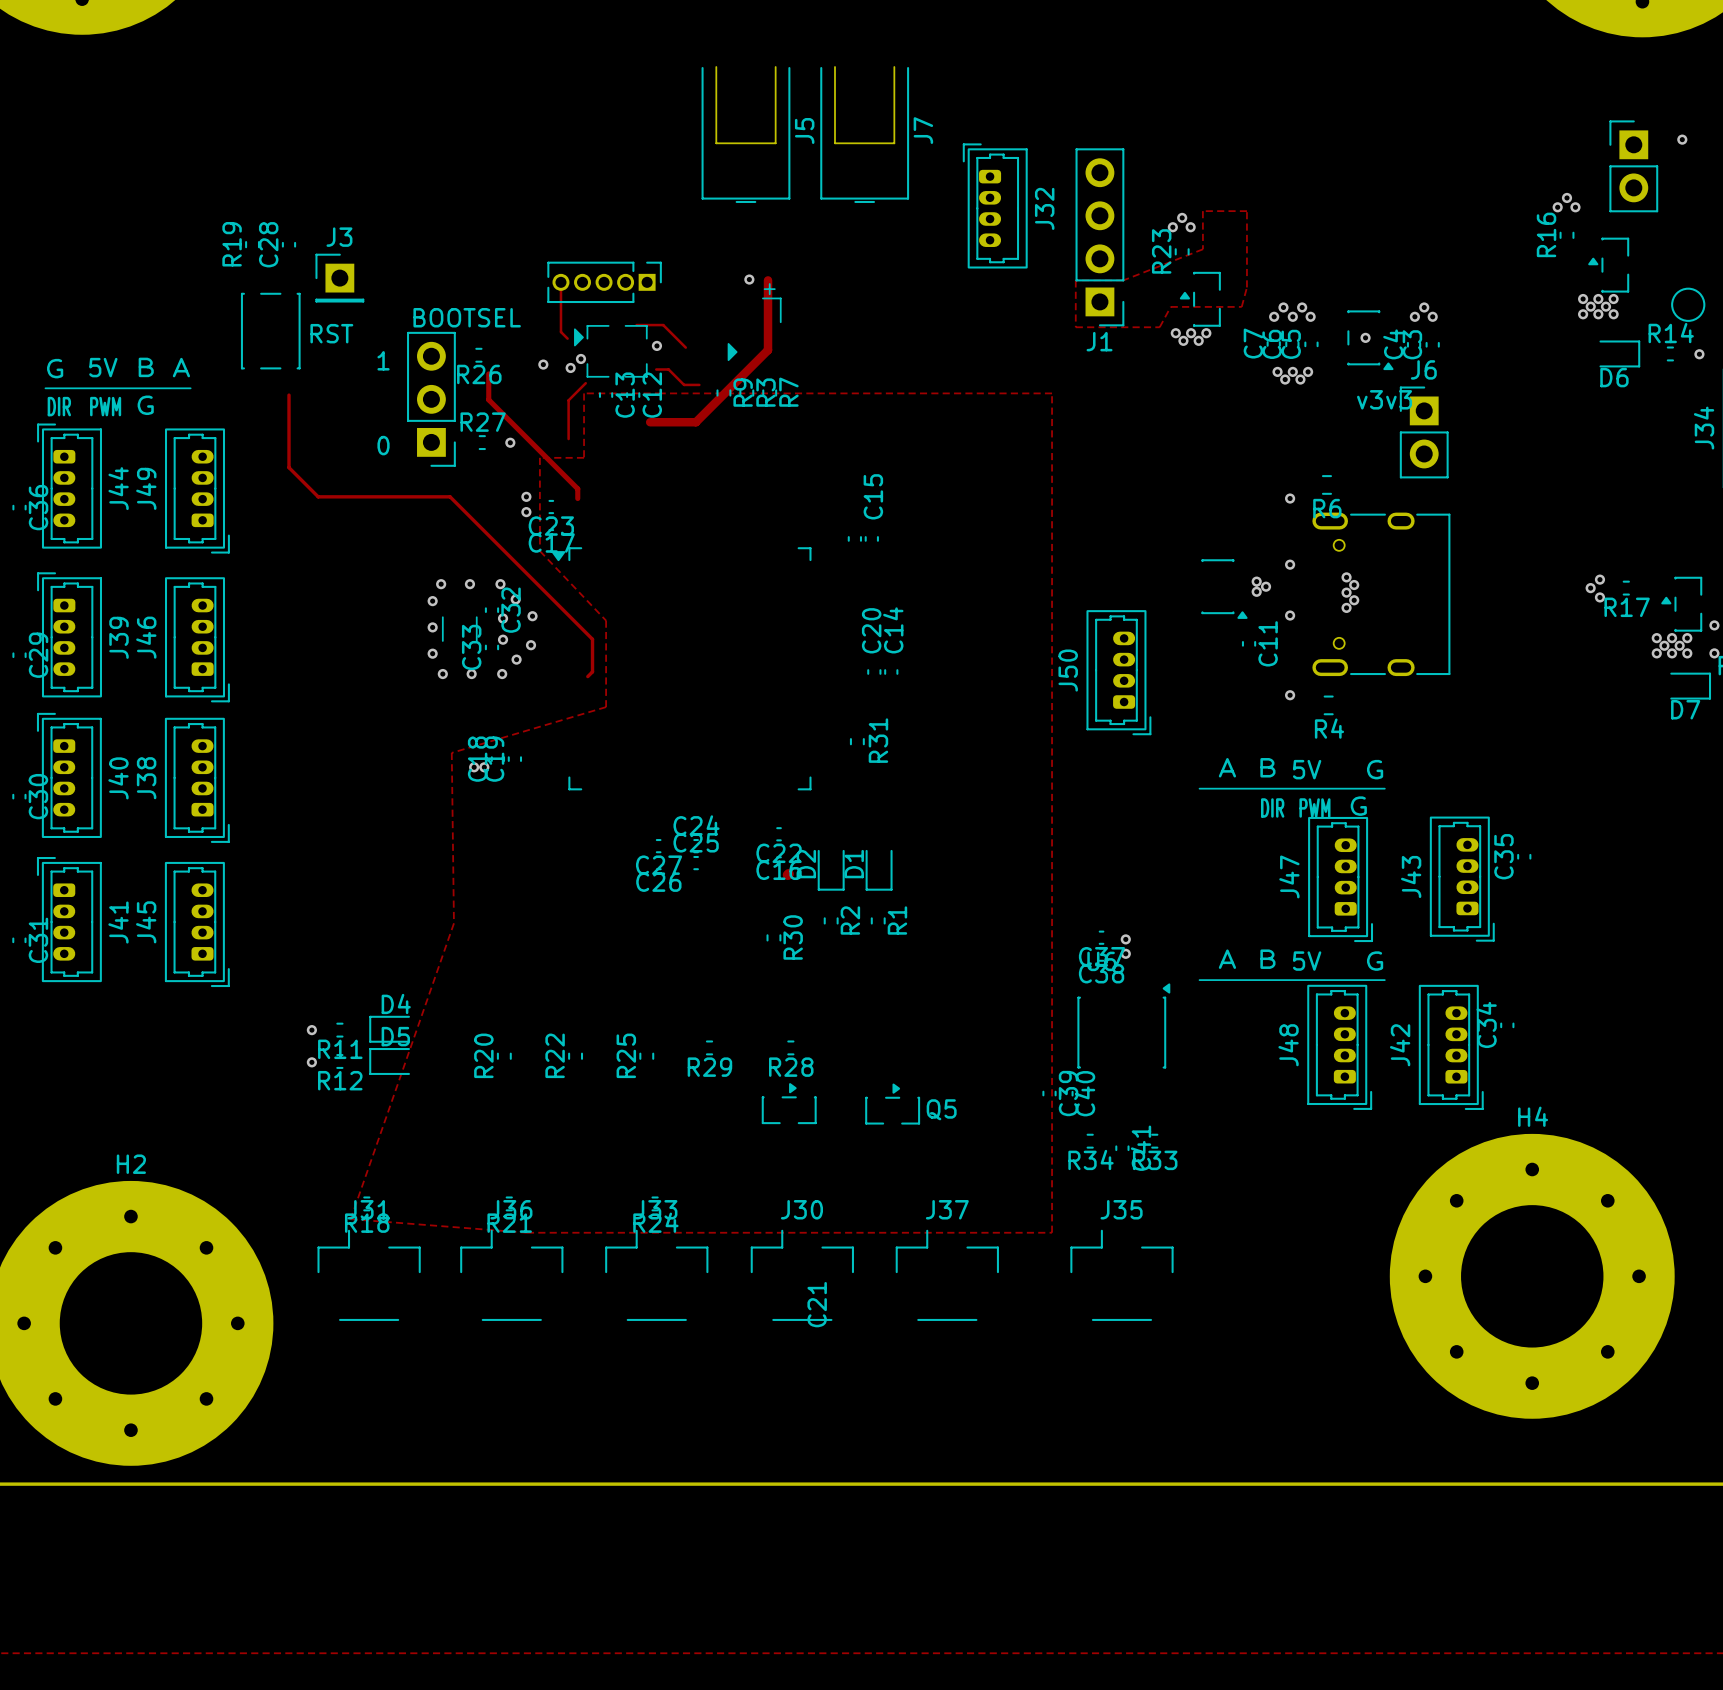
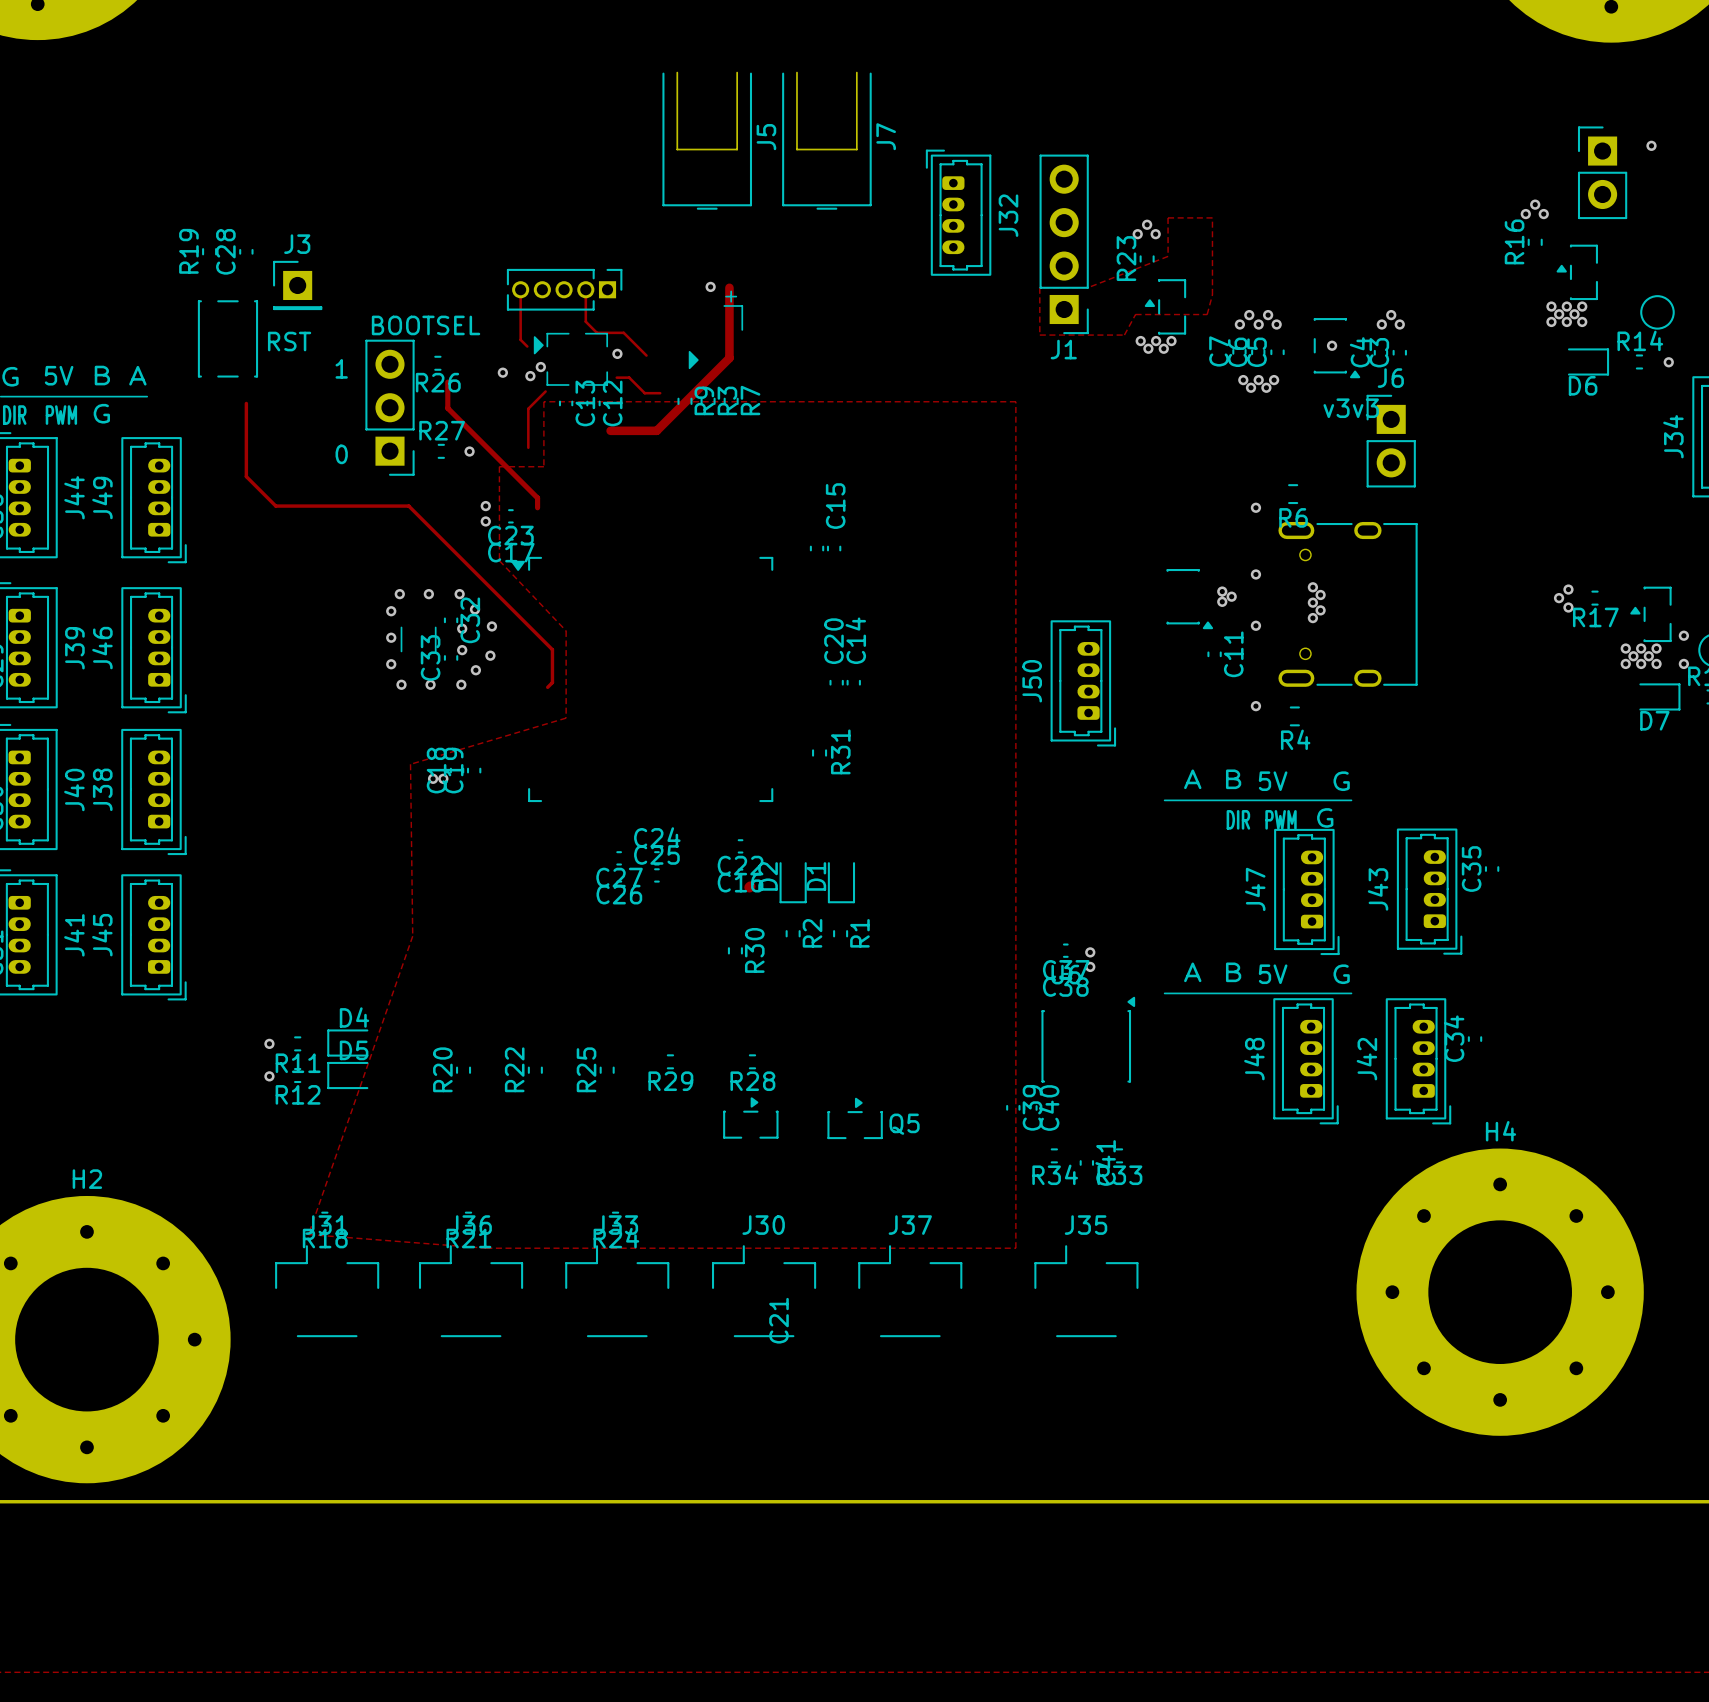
track: none -> (585, 289) (585, 321) (596, 332)

